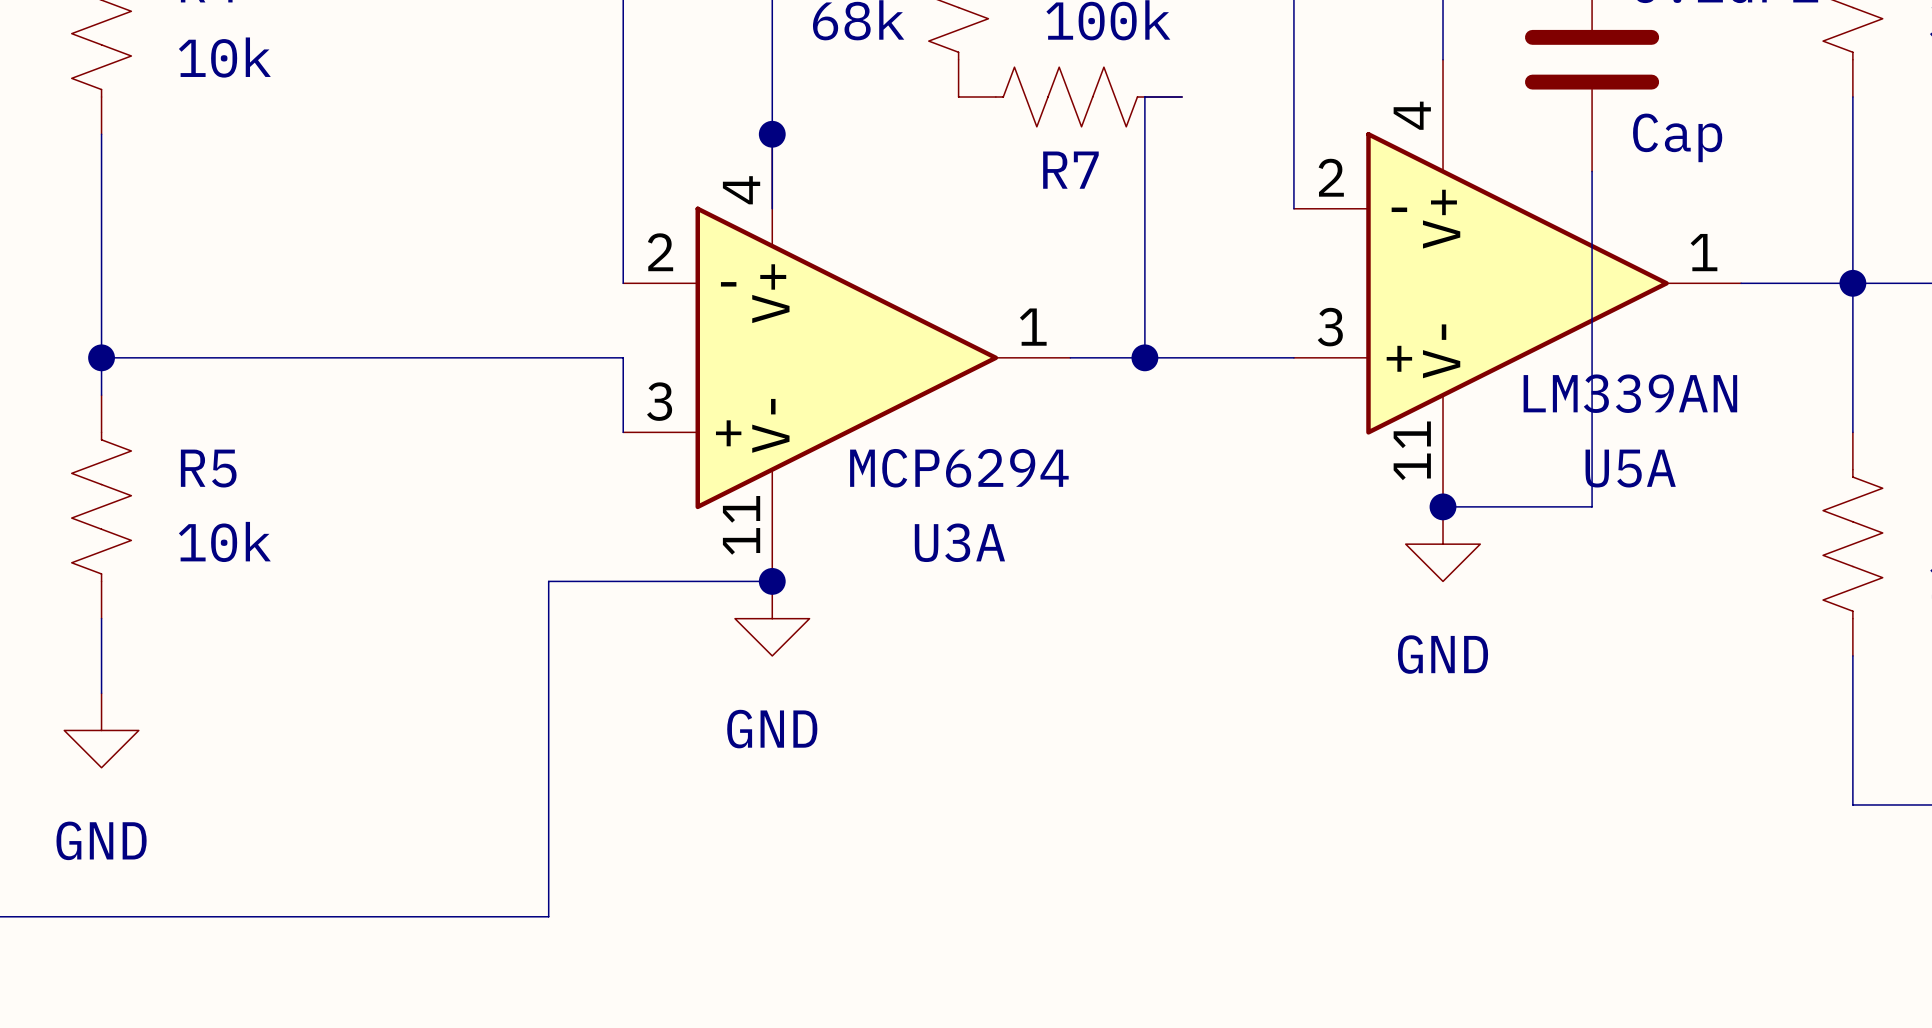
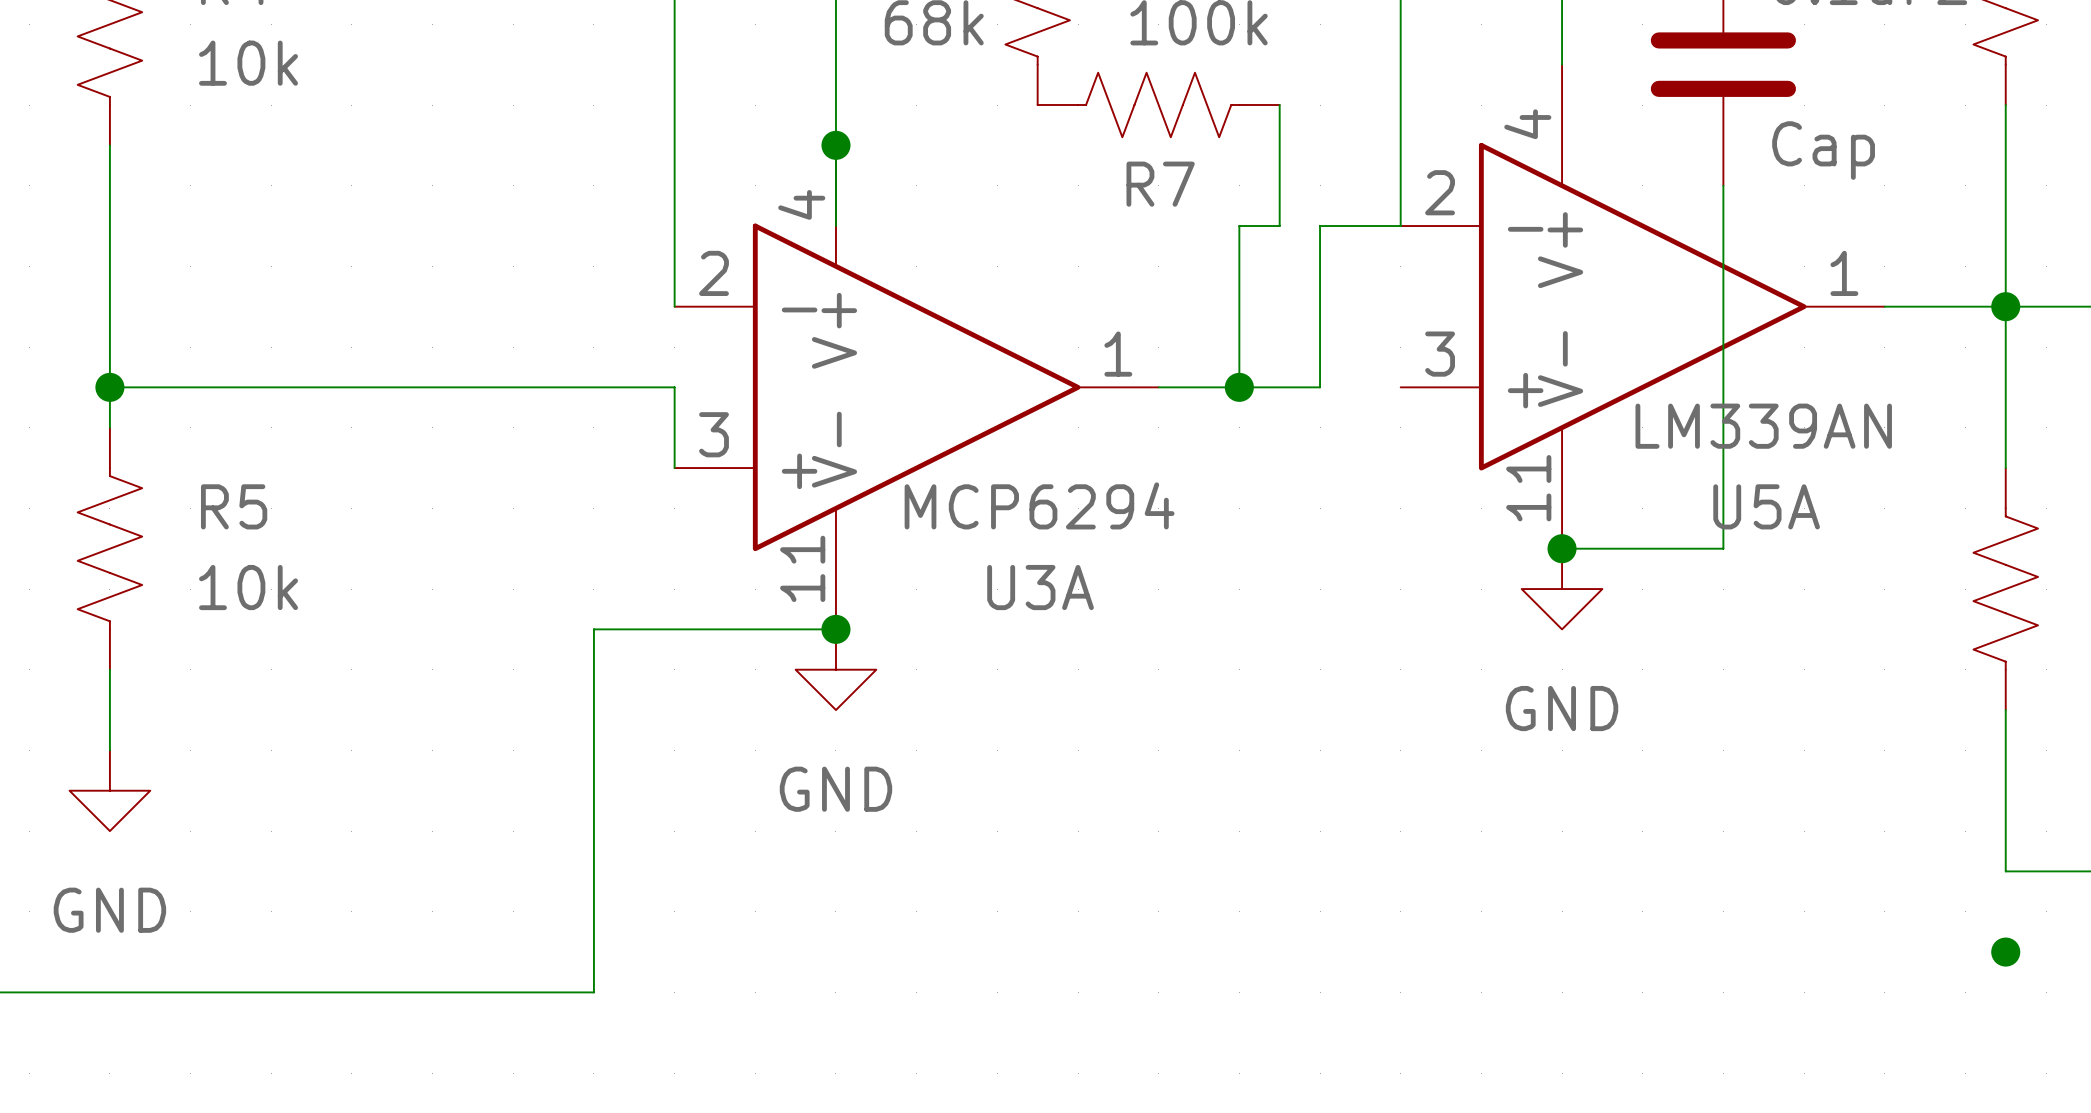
wire: (1182, 97) (1144, 97) (1144, 208) -> (1279, 105) (1279, 226) (1239, 226)
wire: (1219, 357) (1293, 357) -> (1320, 387) (1320, 226) (1400, 226)
junction: none -> (2005, 952)

